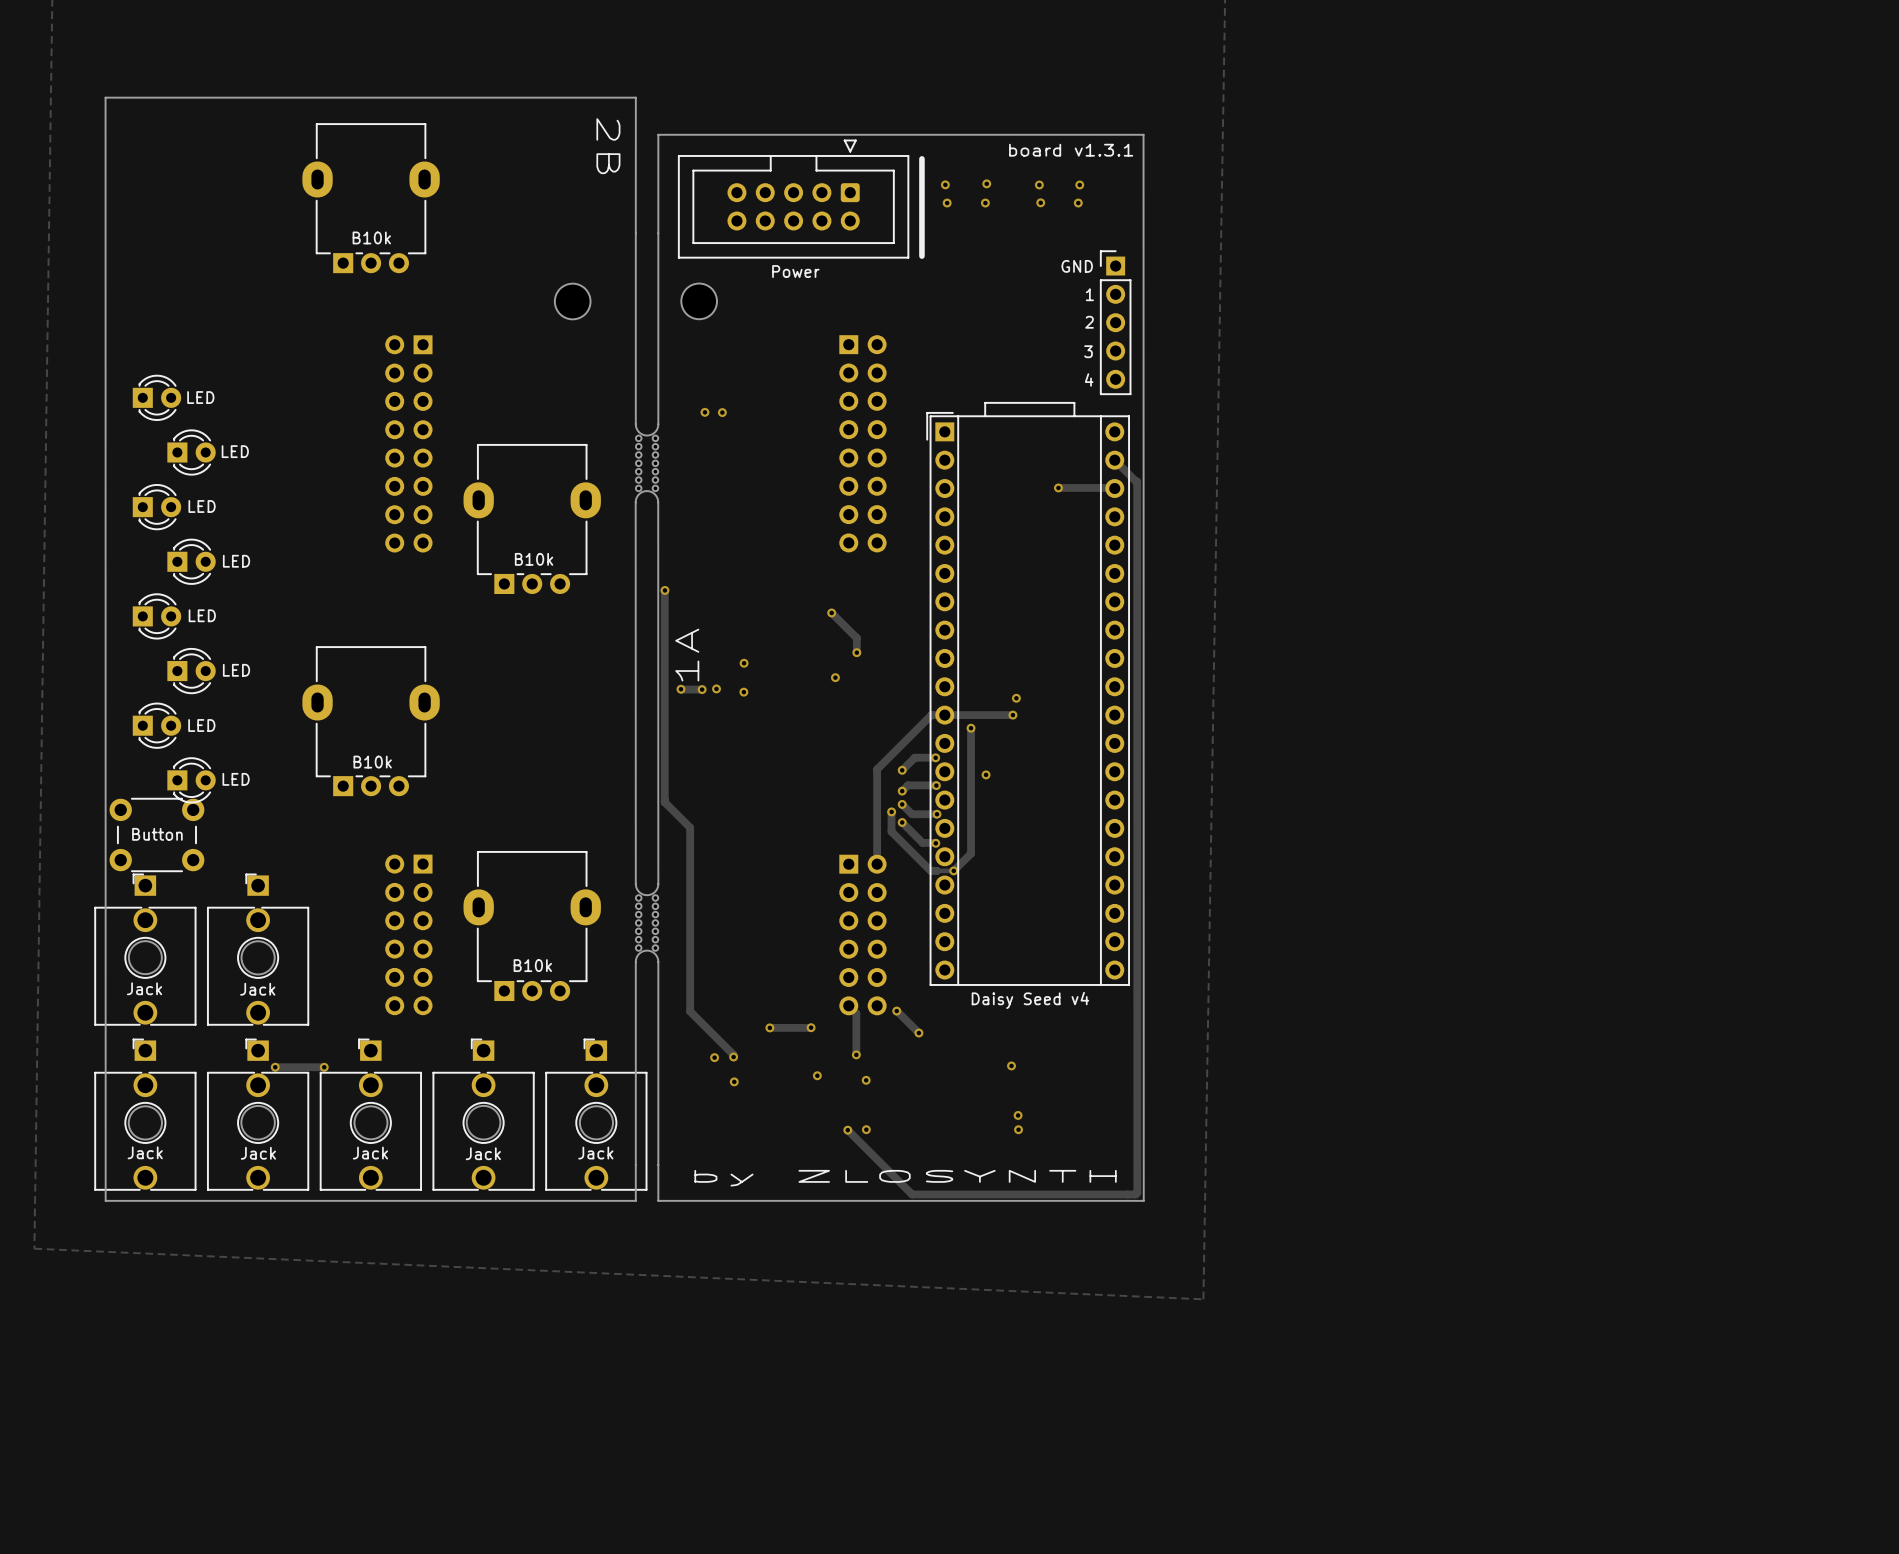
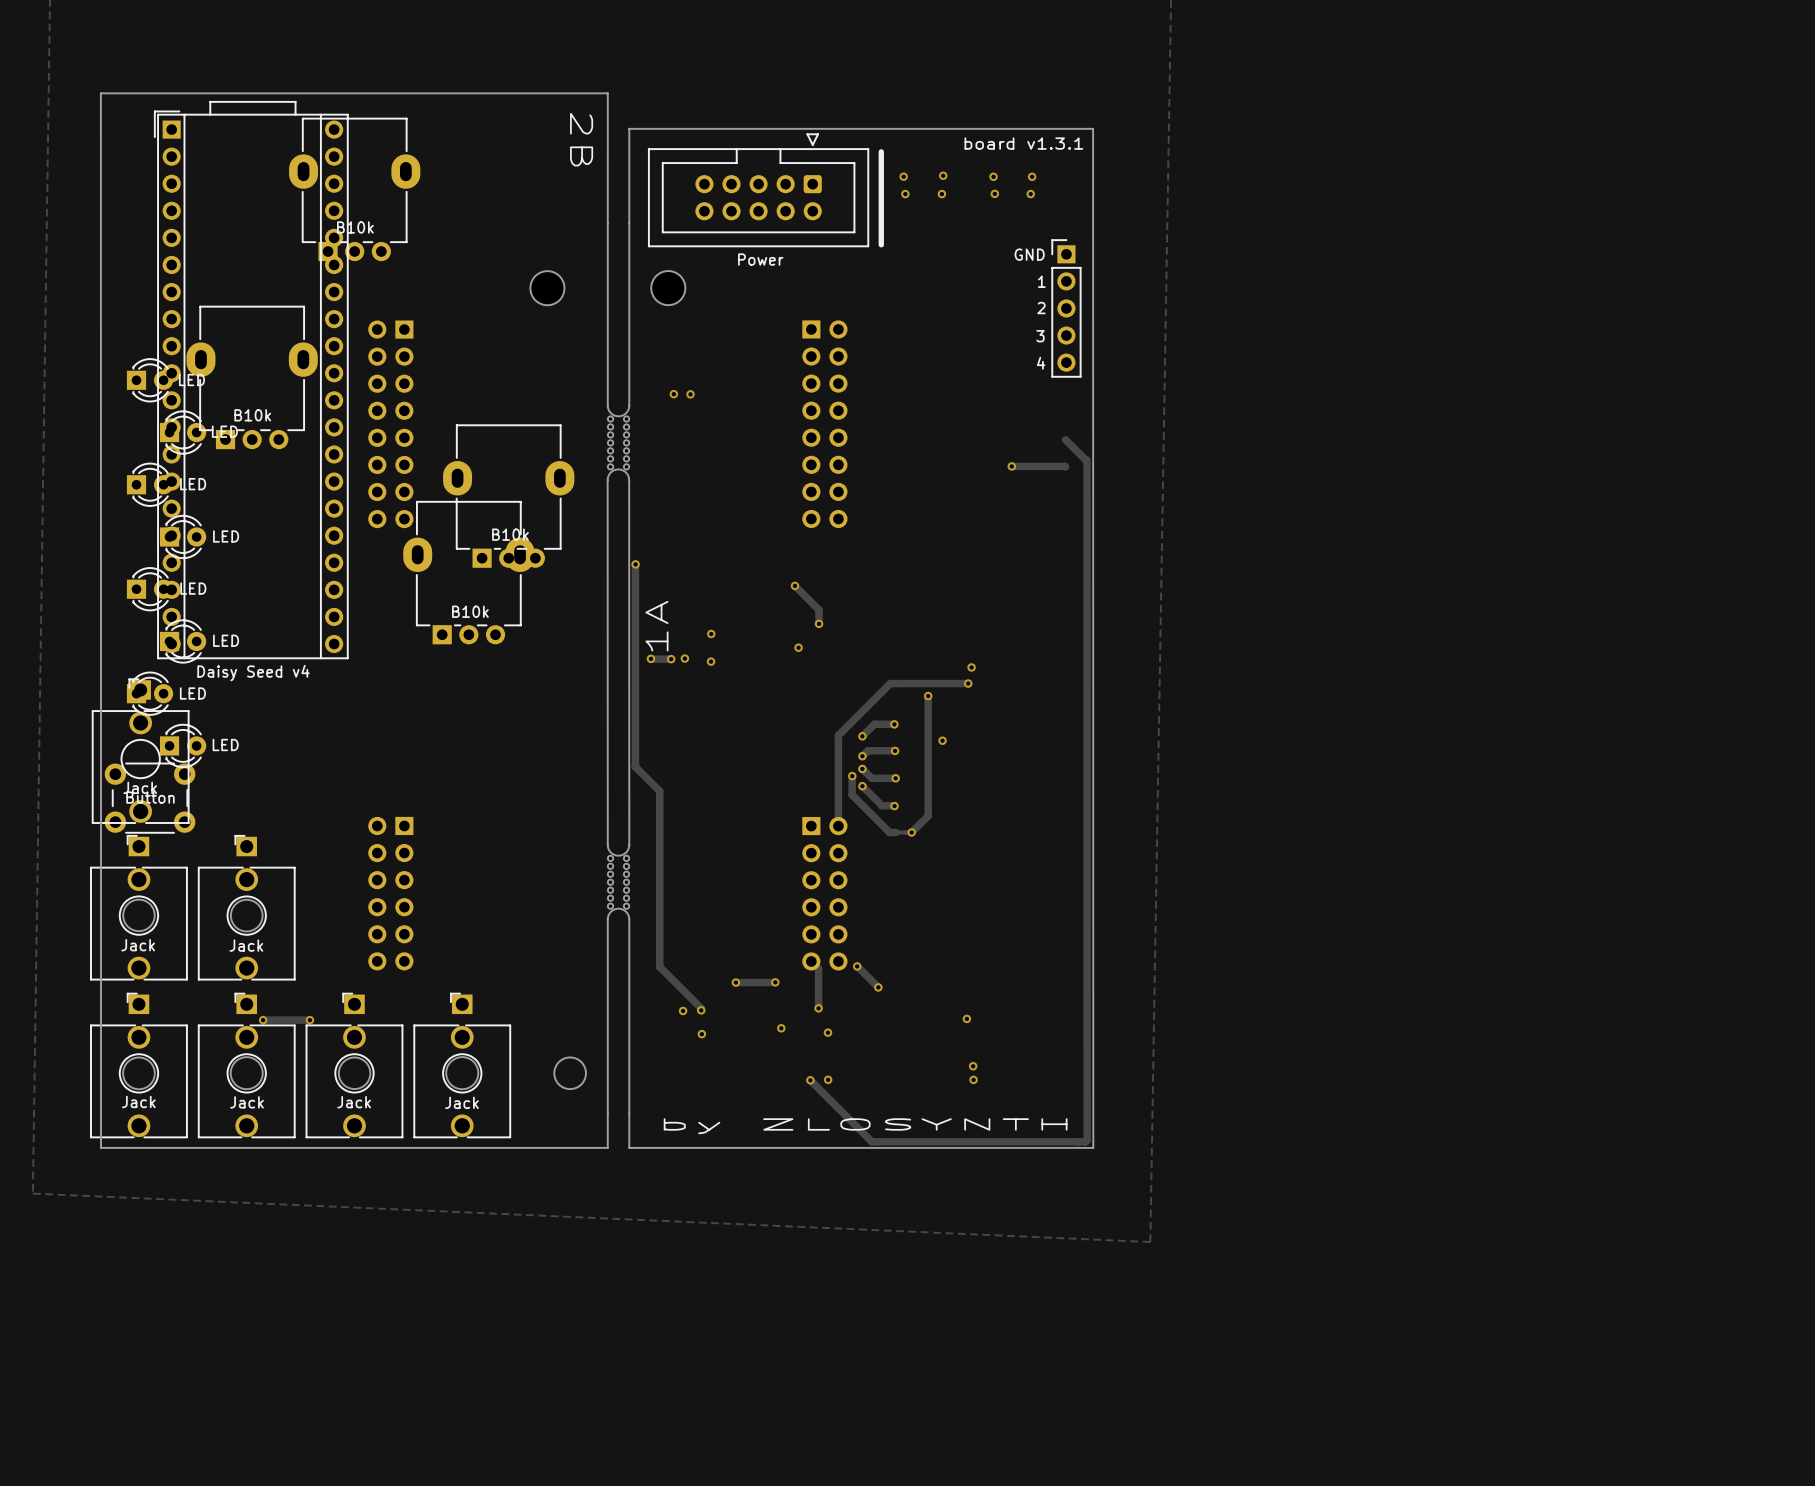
part: none -> B10k (252, 377)
part: none -> Daisy Seed v4 (251, 380)
part: none -> B10k (468, 572)
part: Daisy Seed v4 (1028, 693) -> none
part: B10k (371, 721) -> none
part: none -> Jack (140, 751)
part: B10k (532, 926) -> none
part: Jack (596, 1114) -> none

